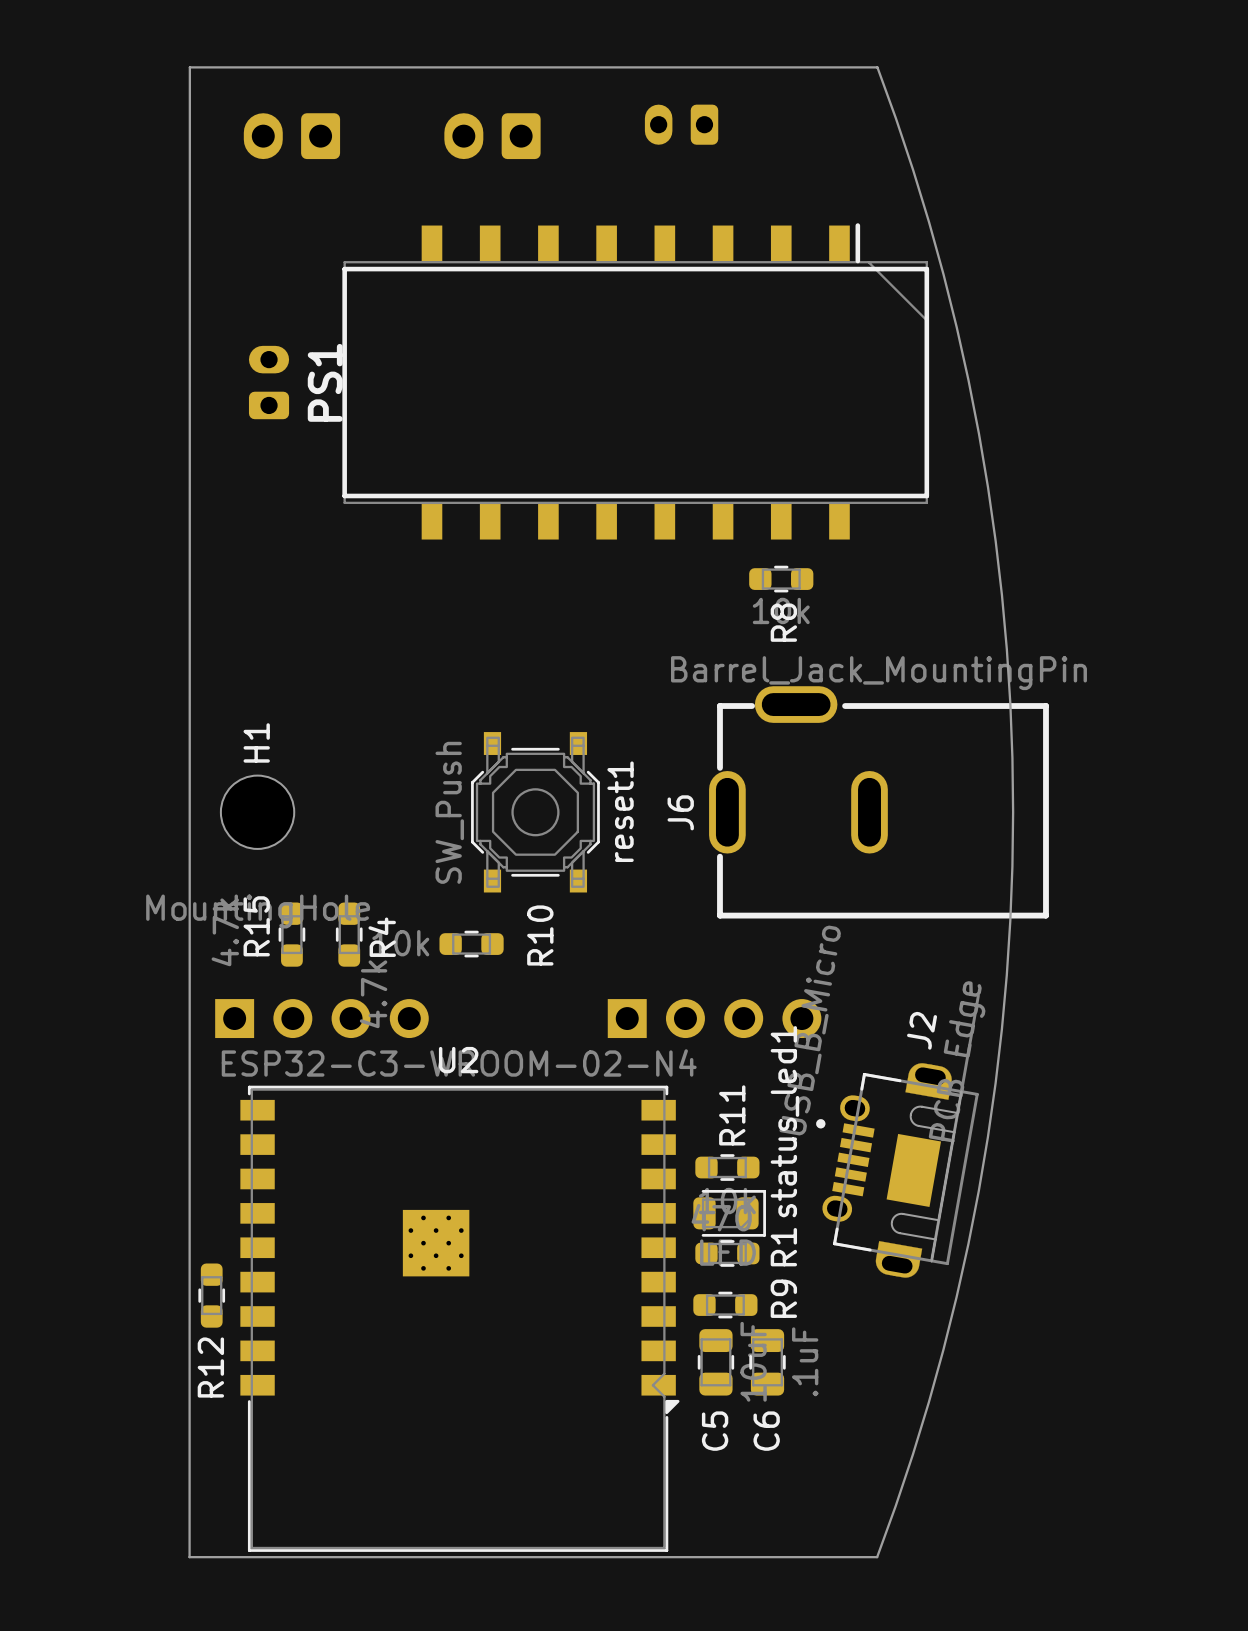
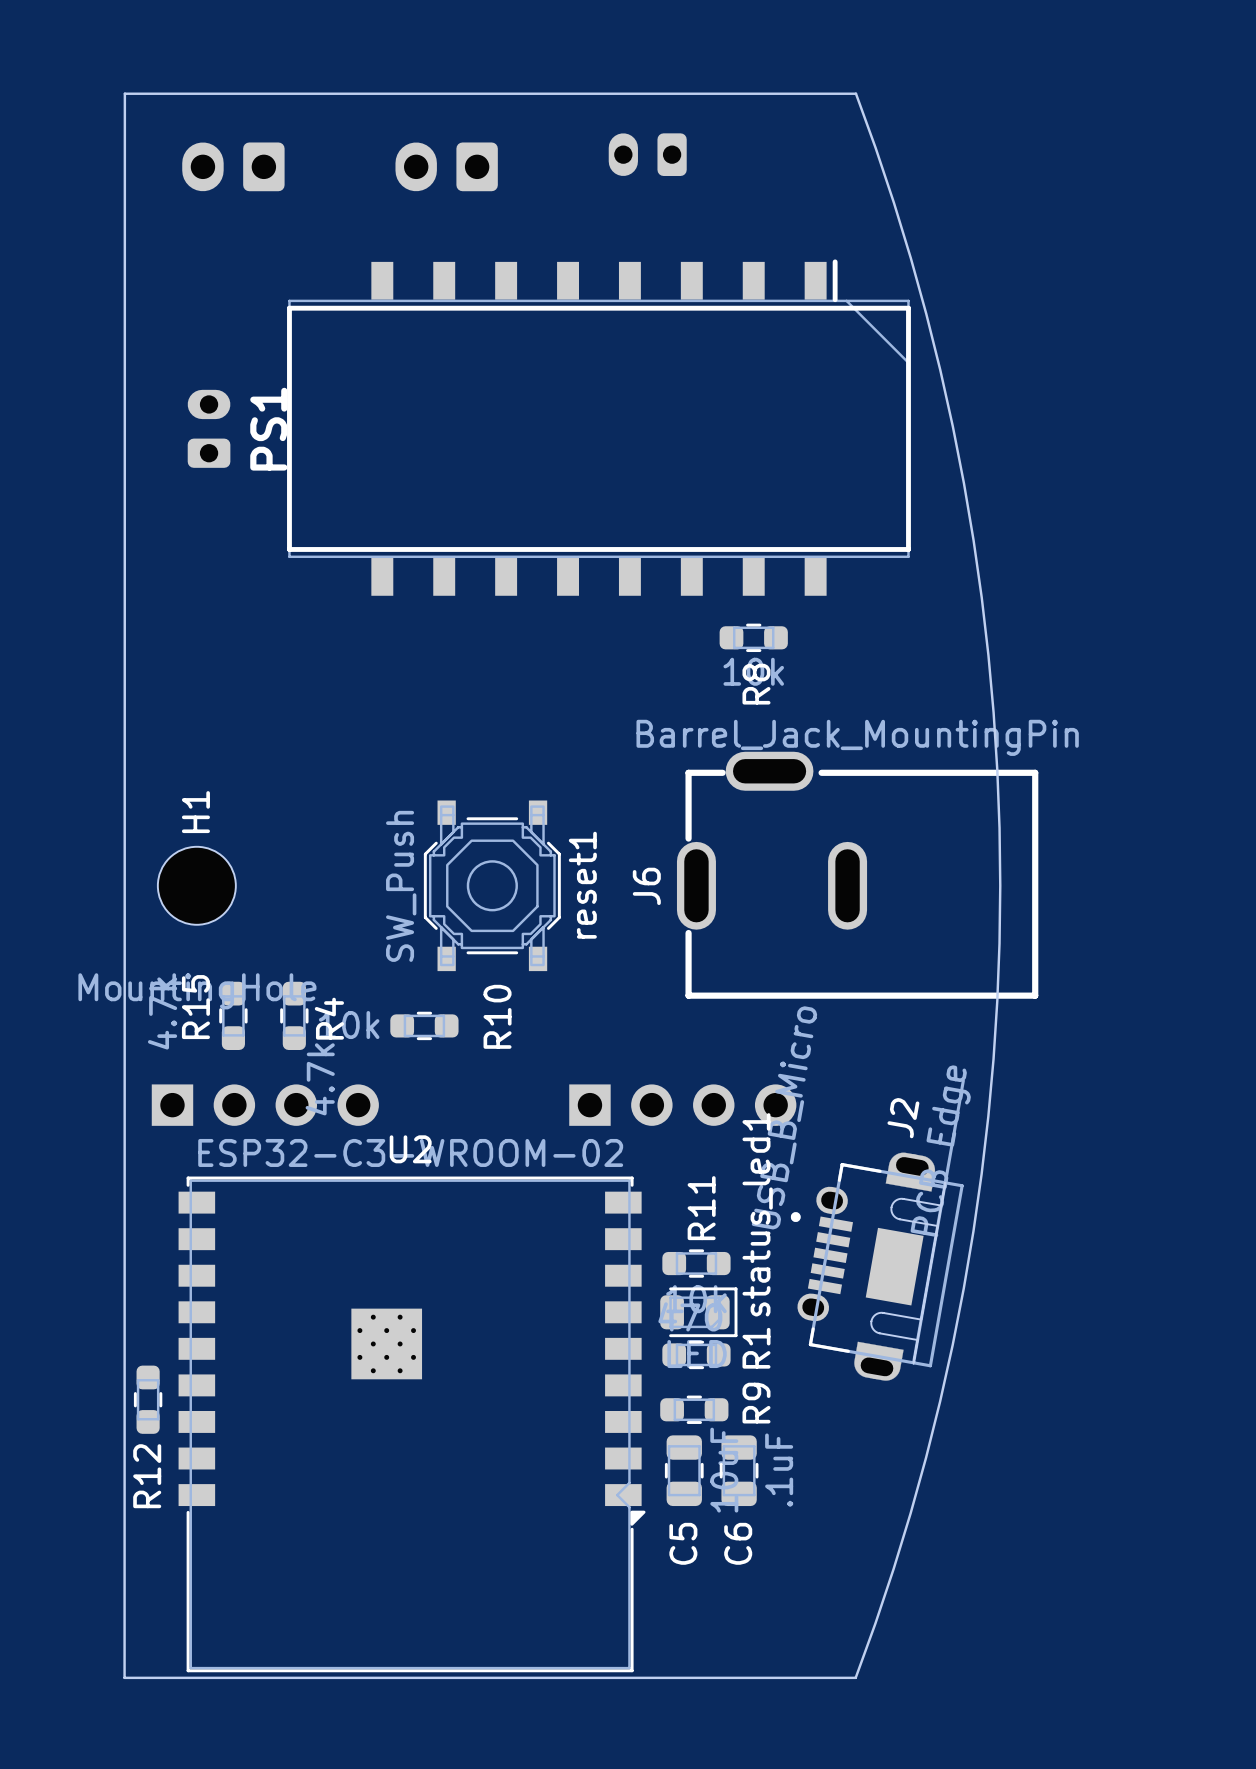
U2 value: ESP32-C3-WROOM-02-N4 (459, 1062) -> ESP32-C3-WROOM-02 (410, 1152)

